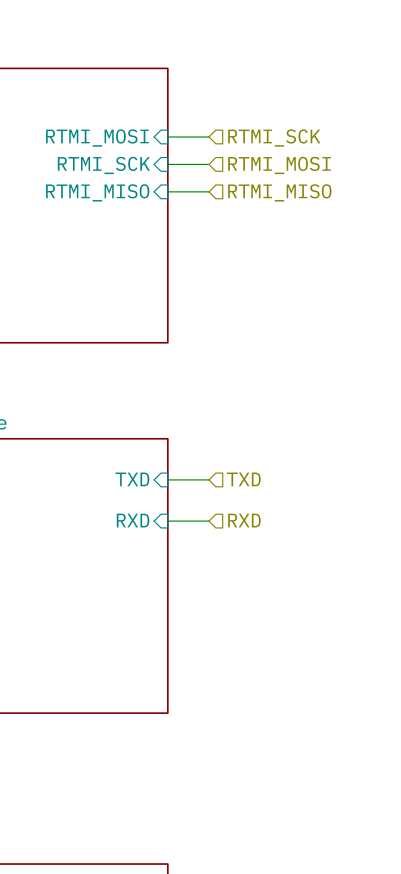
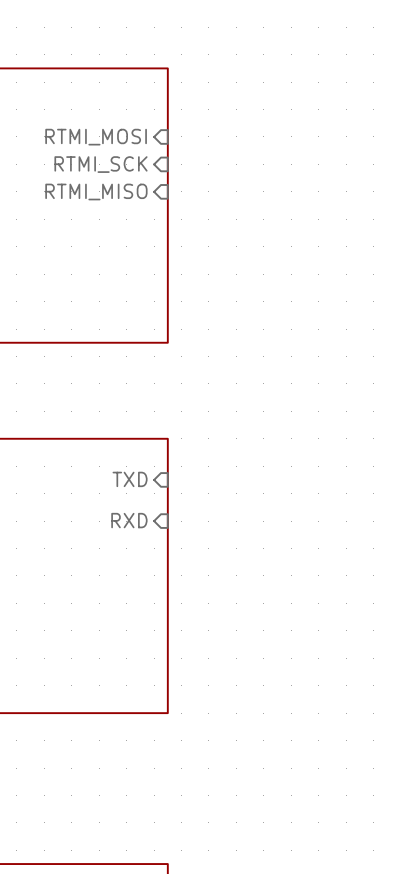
wire: (167, 136) (208, 136) -> none
hierarchical label: RTMI_SCK (274, 138) -> none
wire: (167, 164) (208, 164) -> none
hierarchical label: RTMI_MOSI (279, 165) -> none
wire: (167, 191) (208, 191) -> none
hierarchical label: RTMI_MISO (279, 192) -> none
wire: (167, 479) (208, 479) -> none
hierarchical label: TXD (243, 479) -> none
hierarchical label: RXD (244, 520) -> none
wire: (167, 521) (208, 521) -> none

